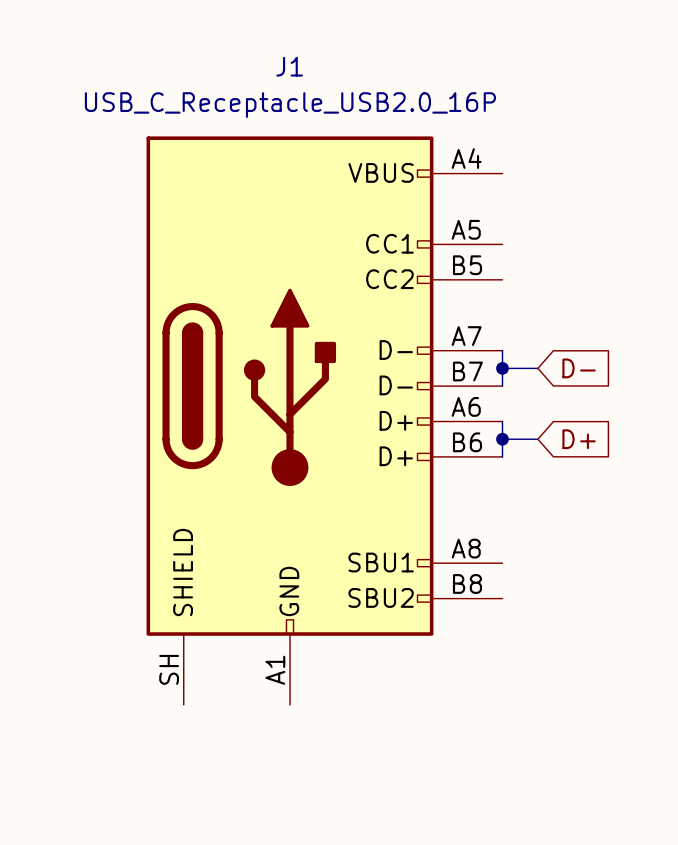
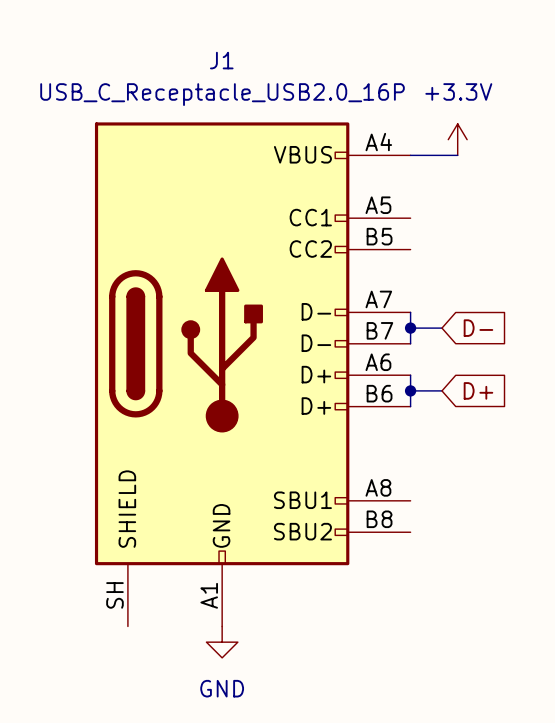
power symbol: none -> +3.3V (457, 139)
wire: none -> (410, 155) (457, 155)
power symbol: none -> GND (222, 642)

